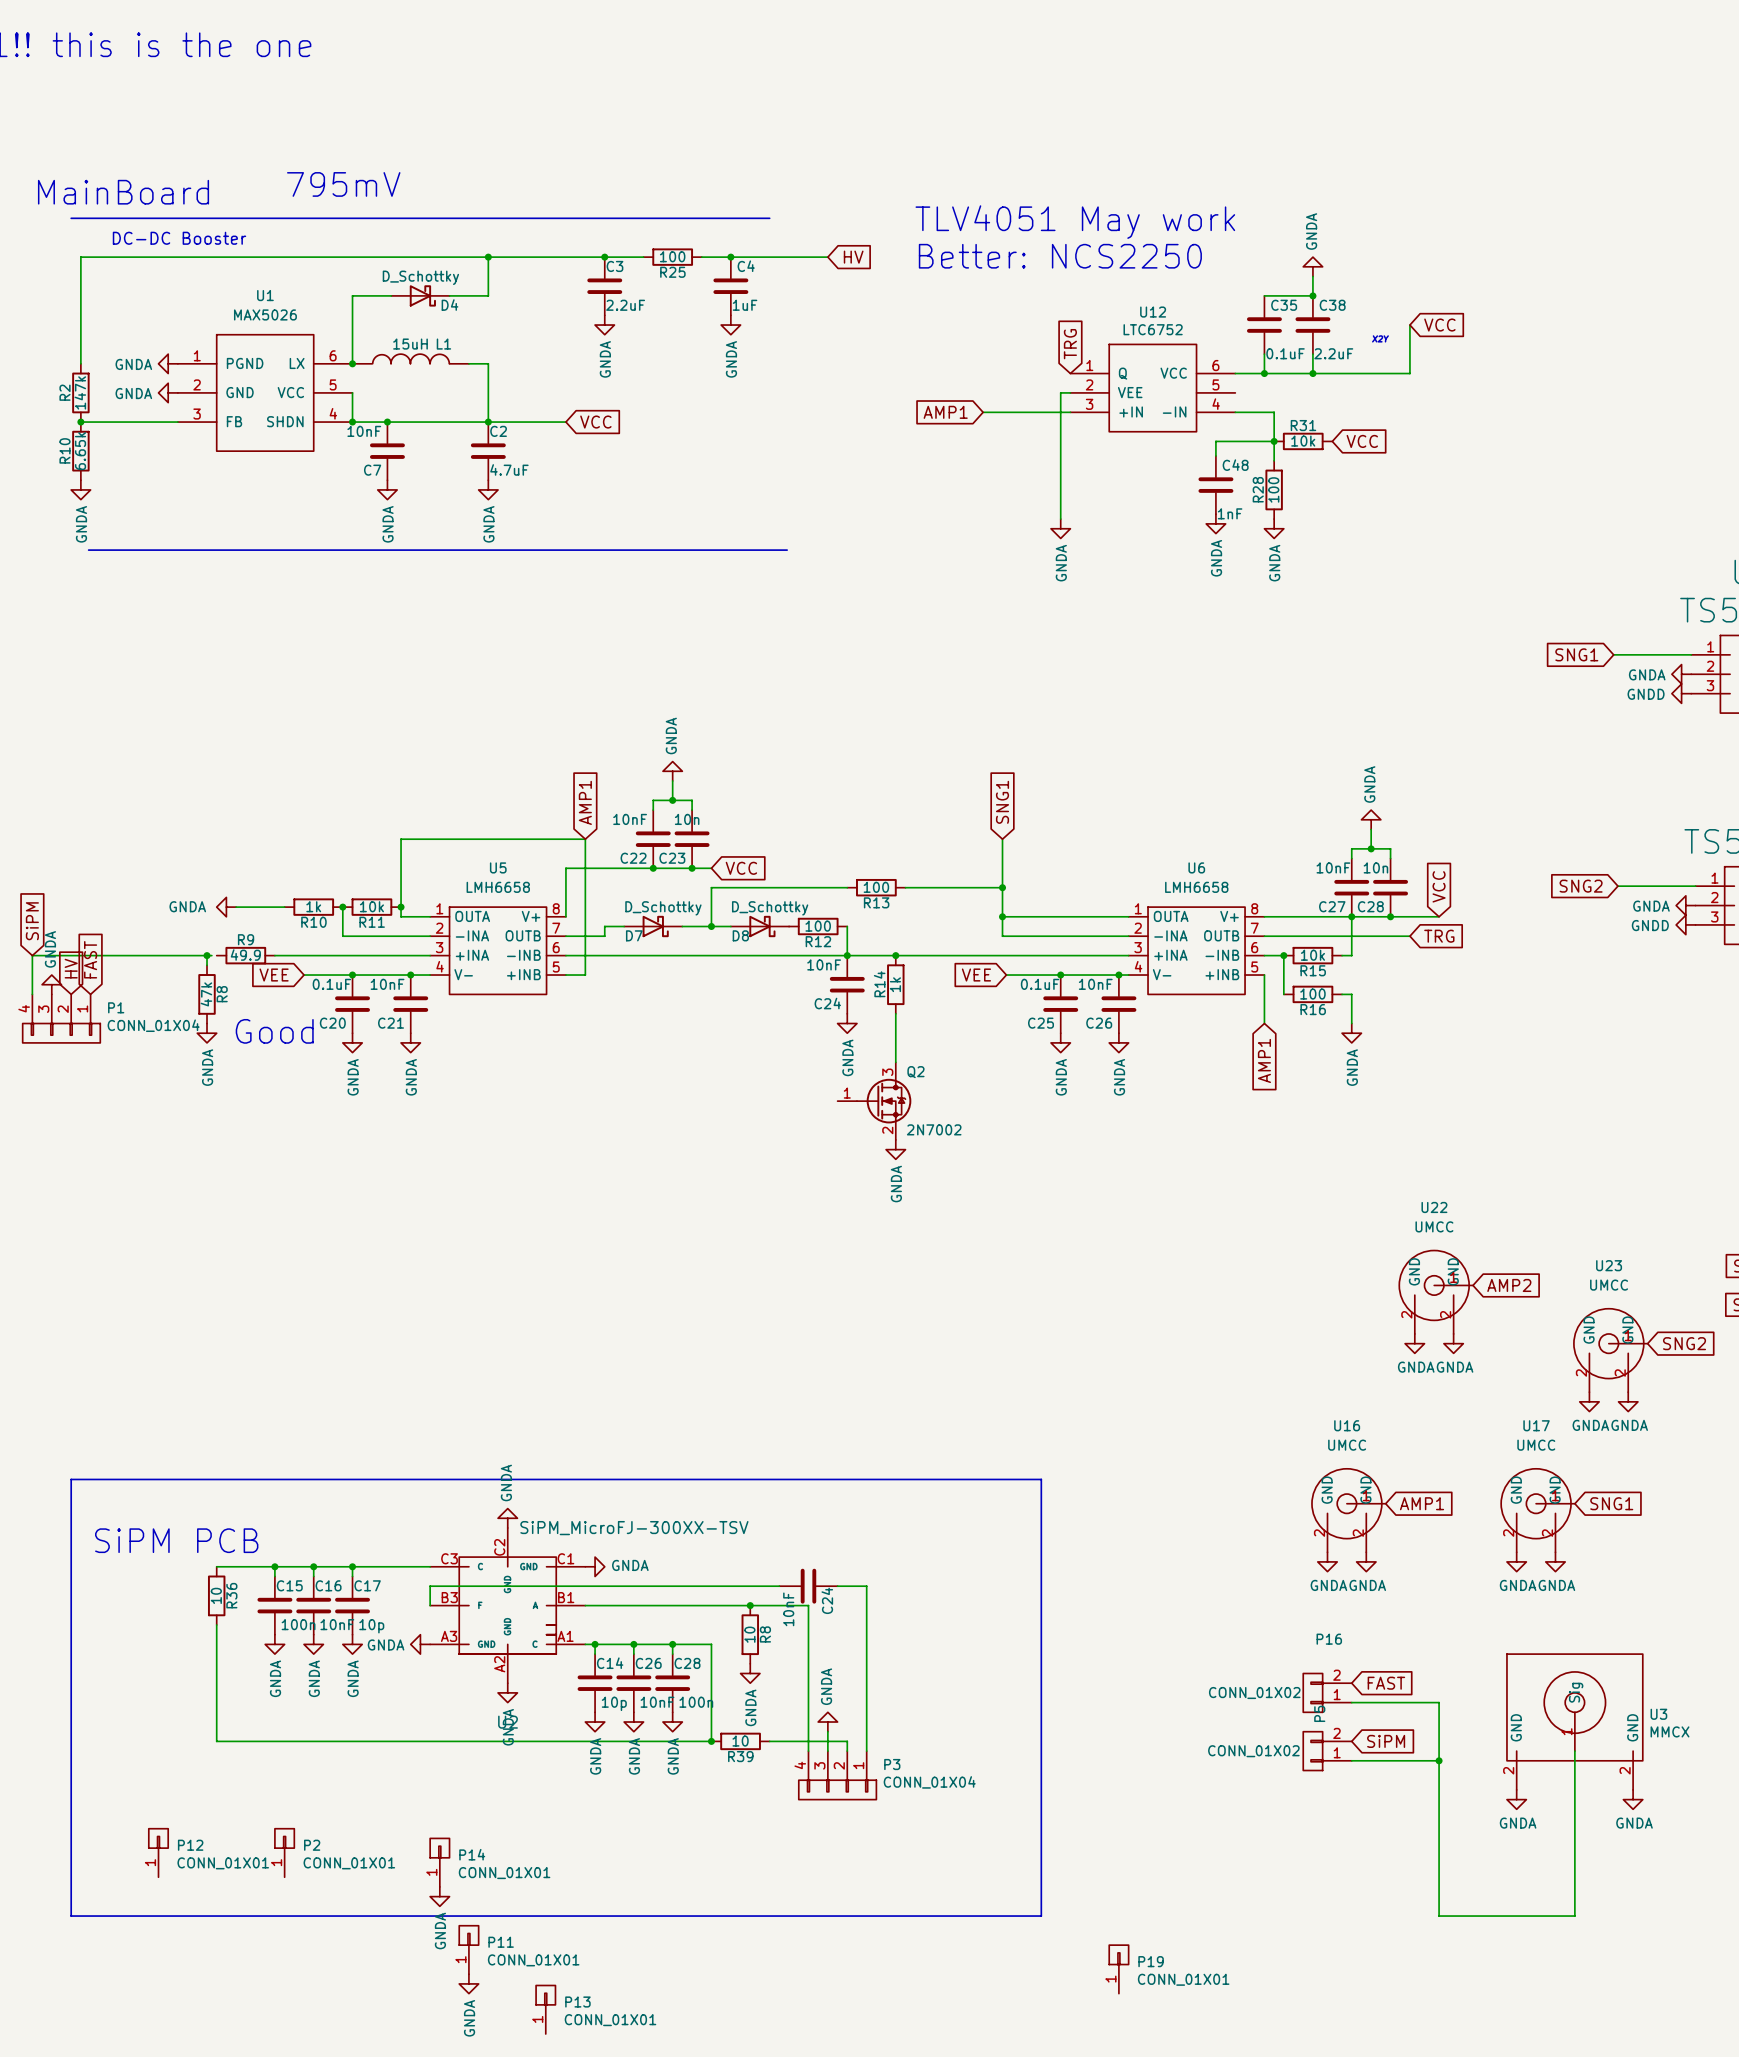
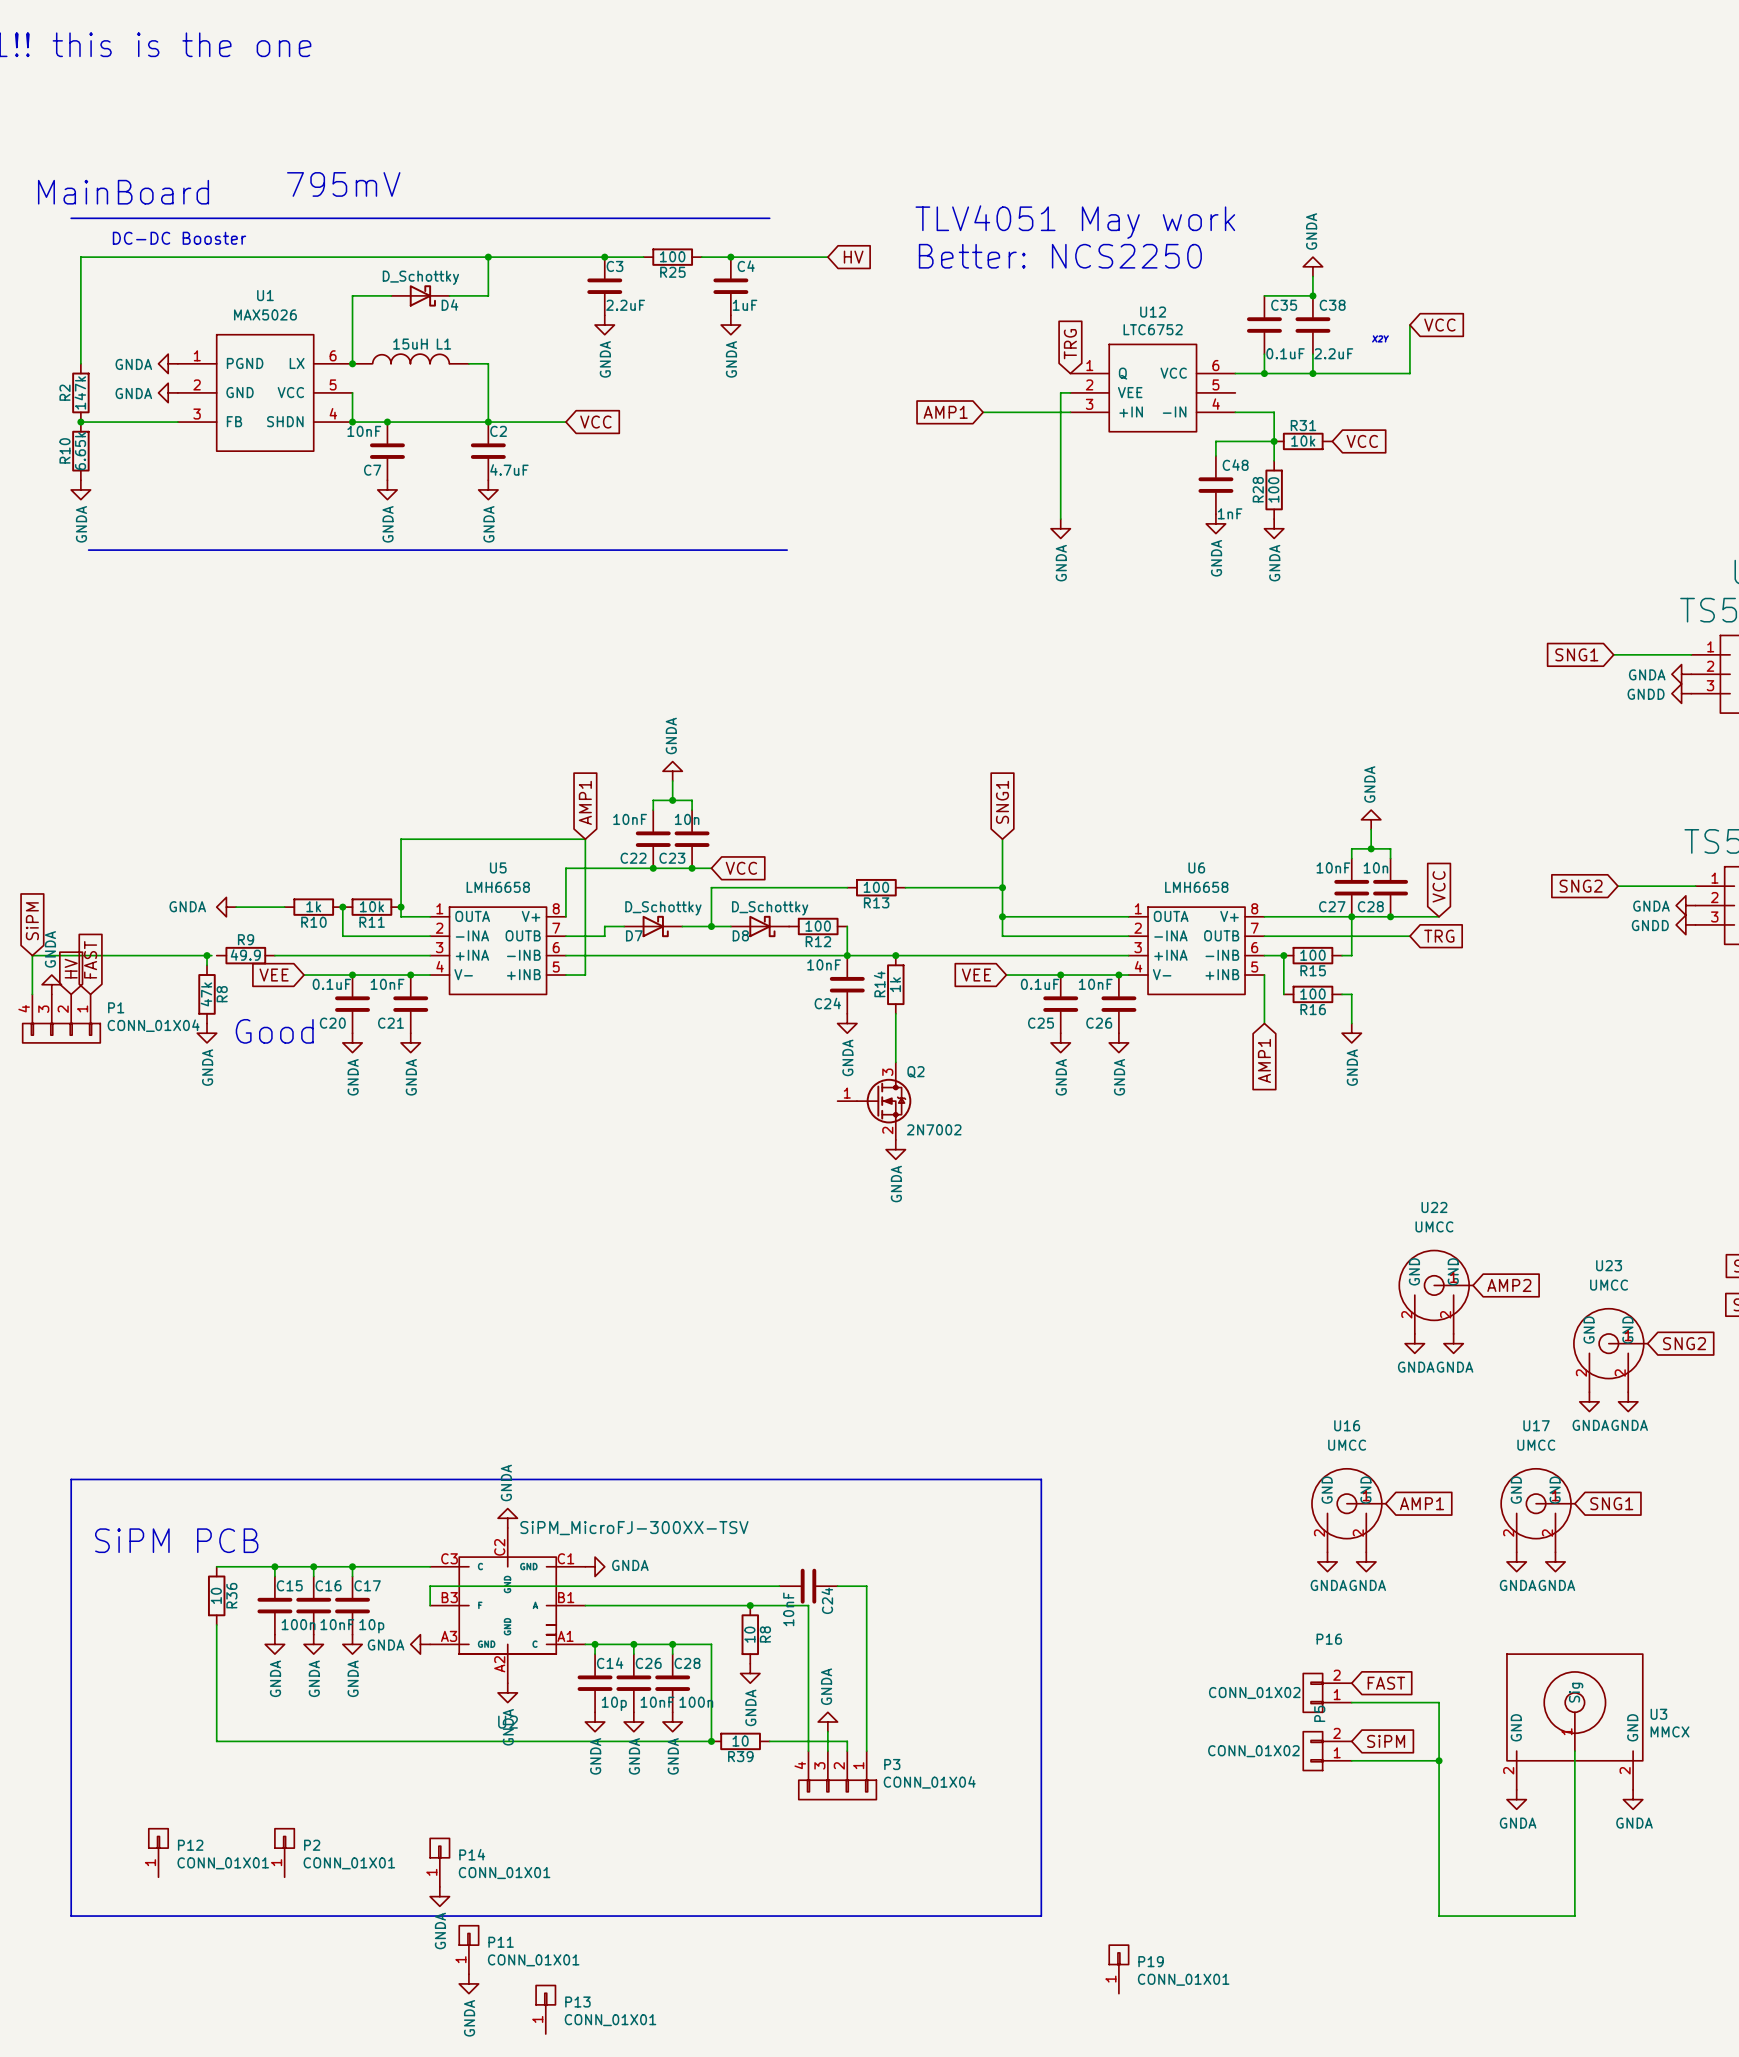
R15 value: 10k (1312, 955) -> 100 (1312, 955)

